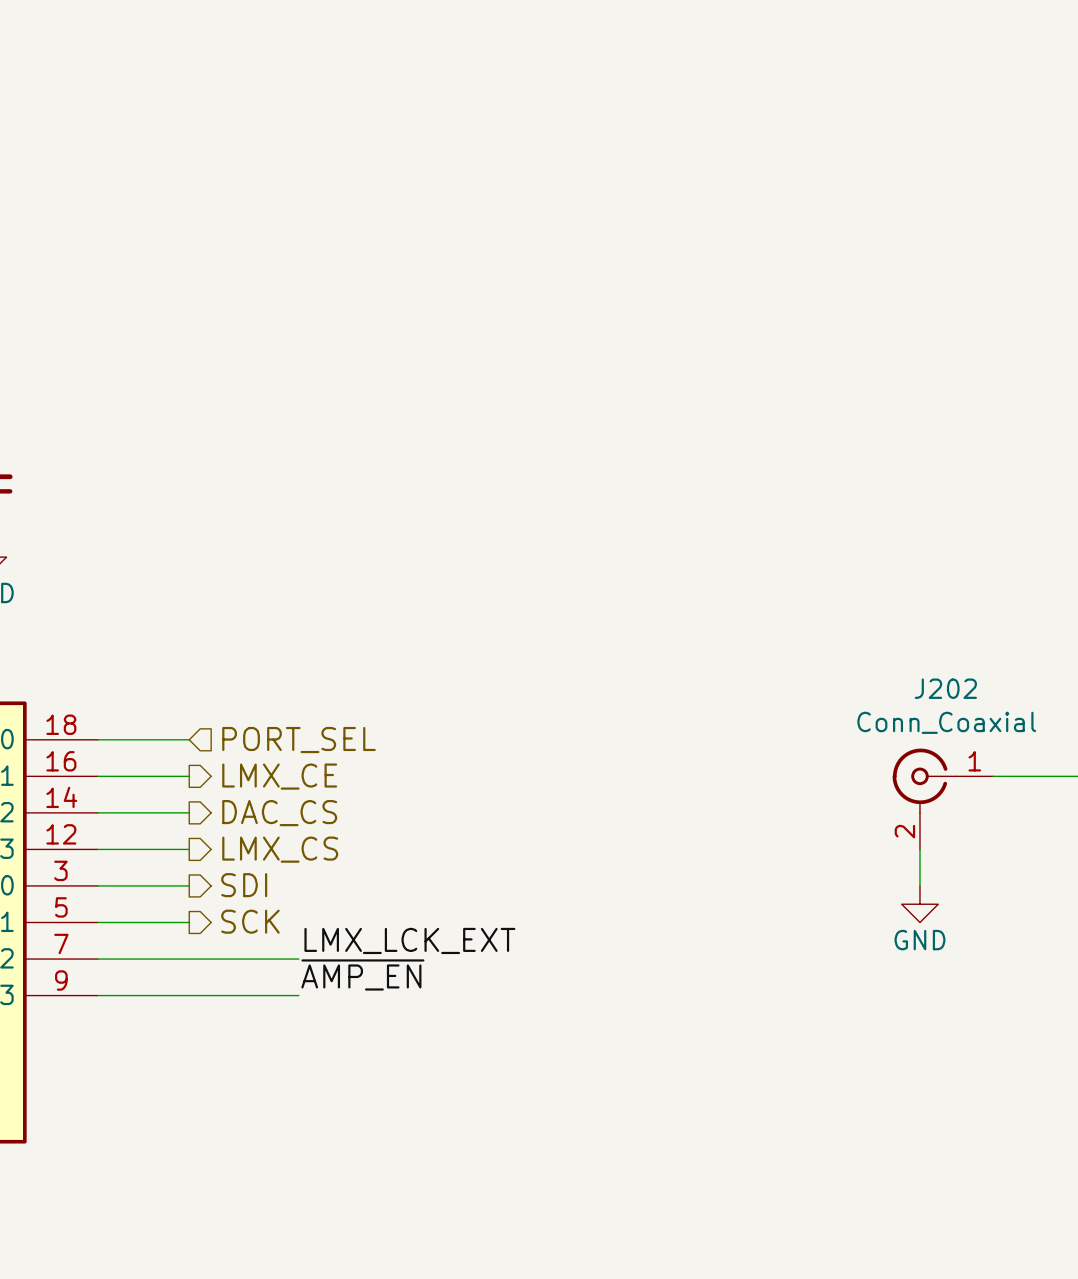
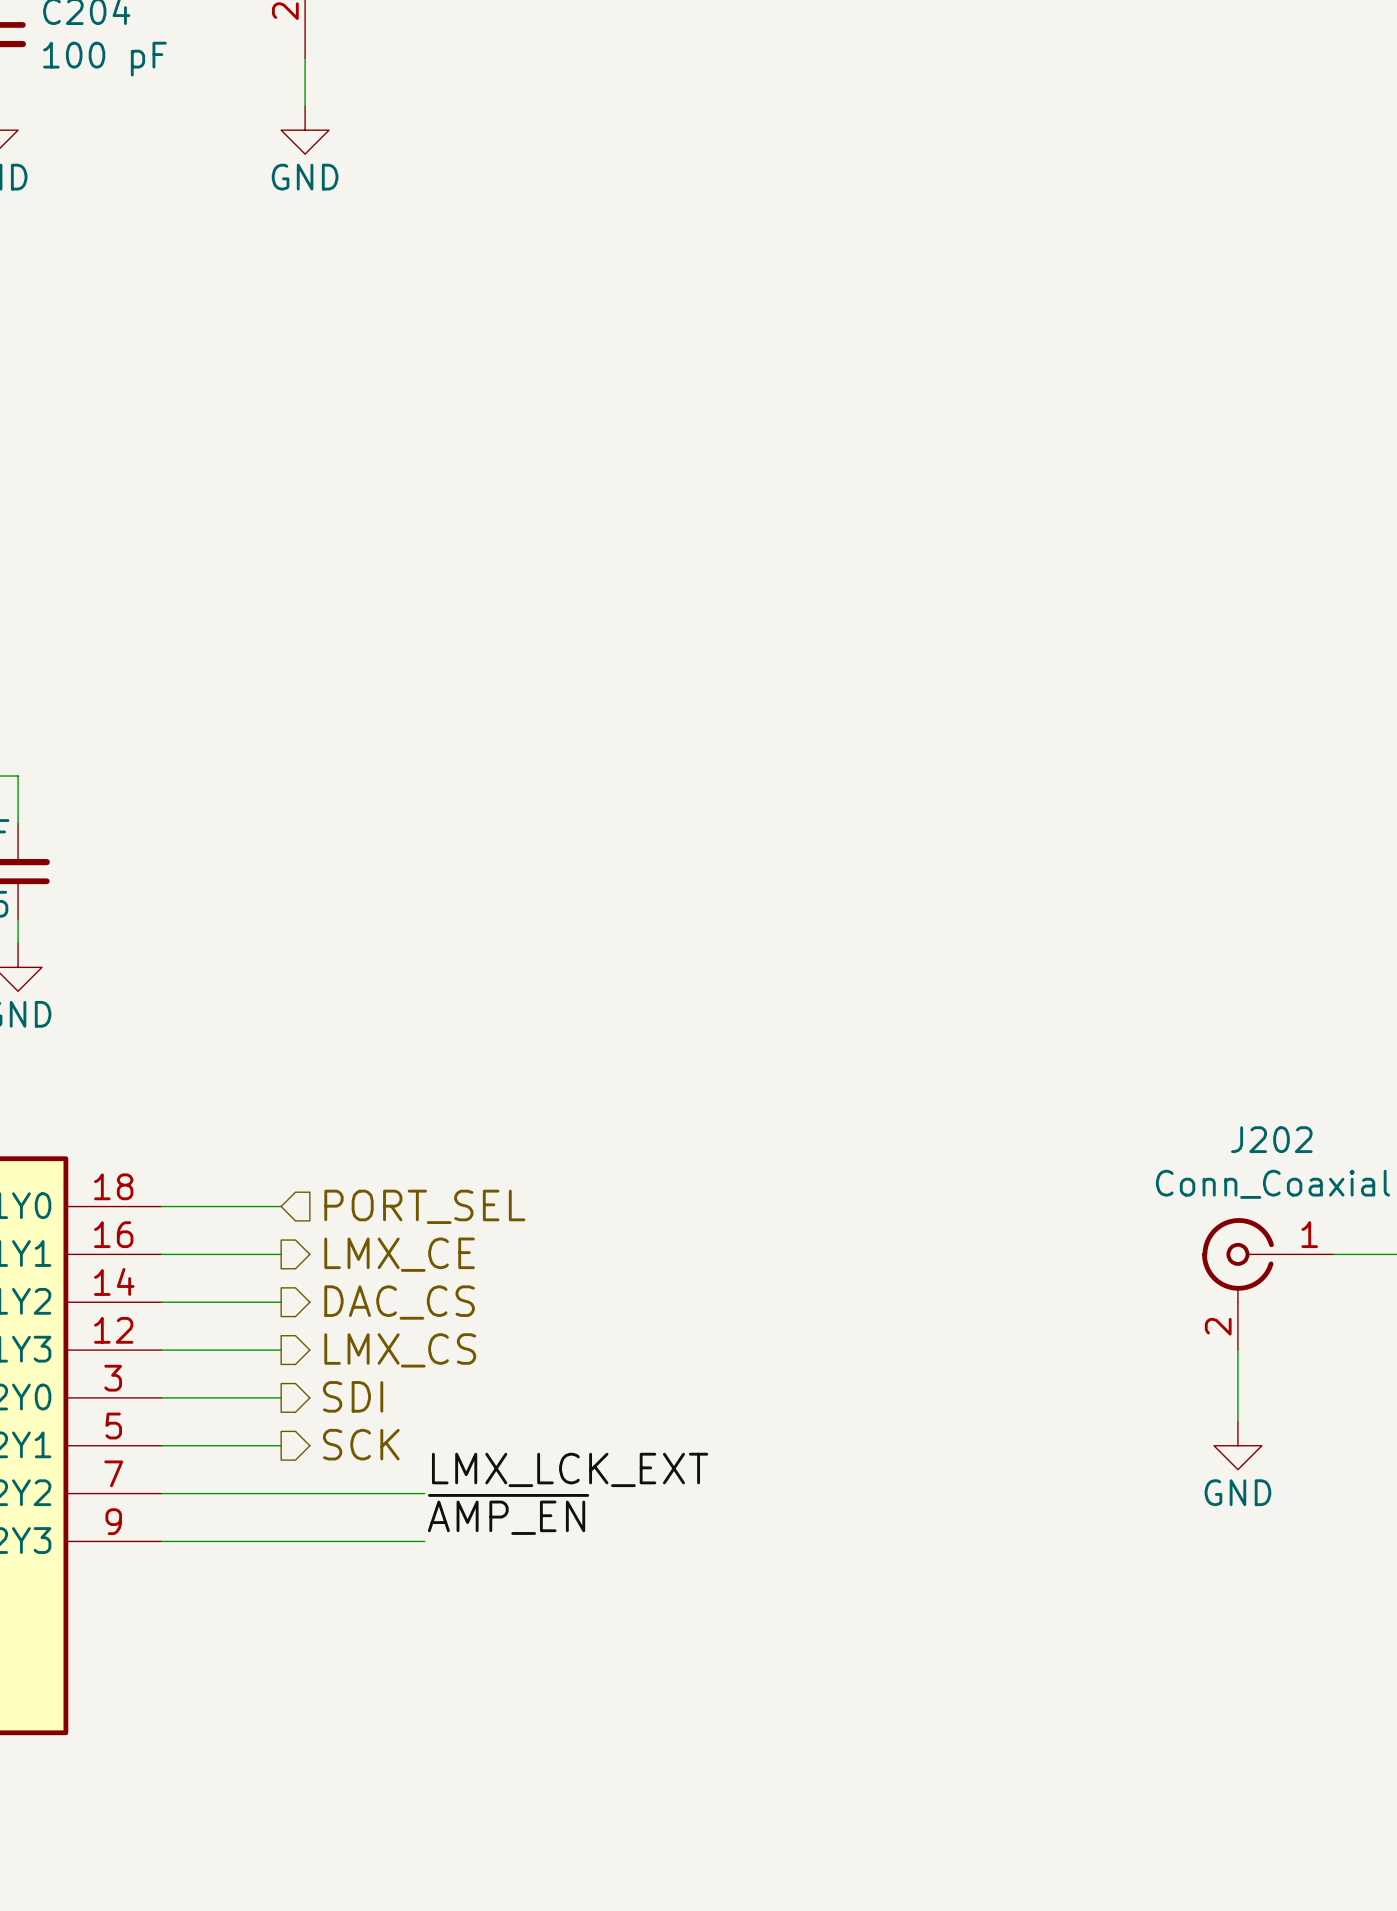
power symbol position: GND (919, 904) -> GND (1237, 1445)

